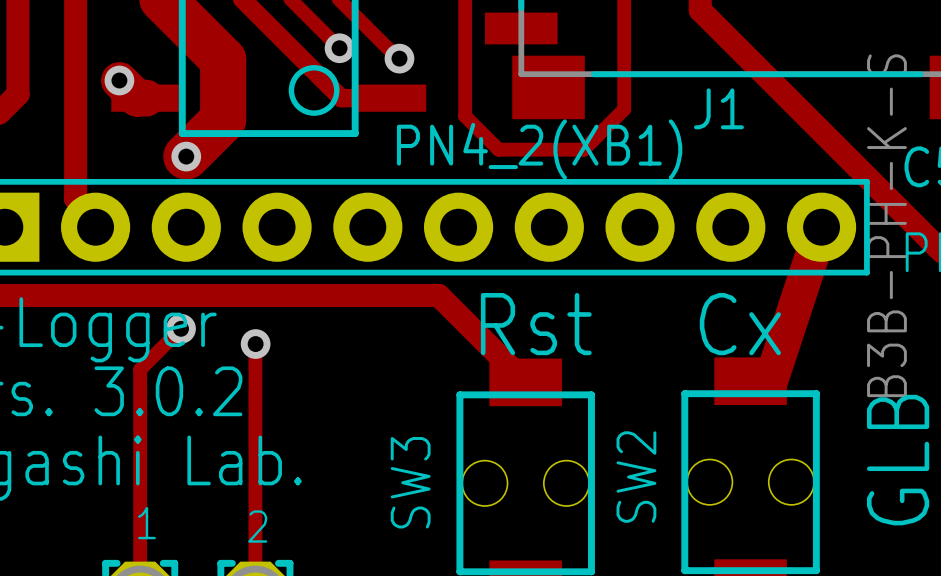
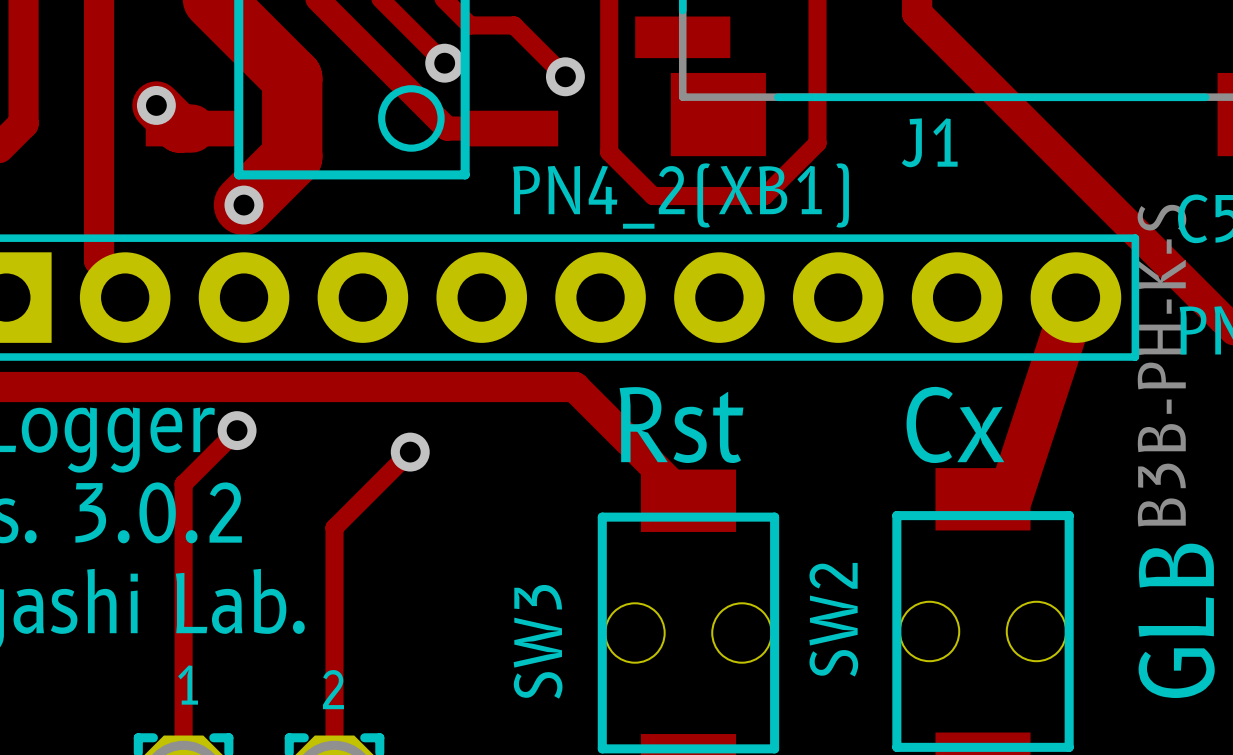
track: (358, 19) (399, 58) -> (470, 25) (514, 25) (565, 76)
via position: (399, 58) -> (565, 76)
track: (255, 344) (255, 403) -> (410, 452) (334, 527)
via position: (255, 344) -> (410, 452)

